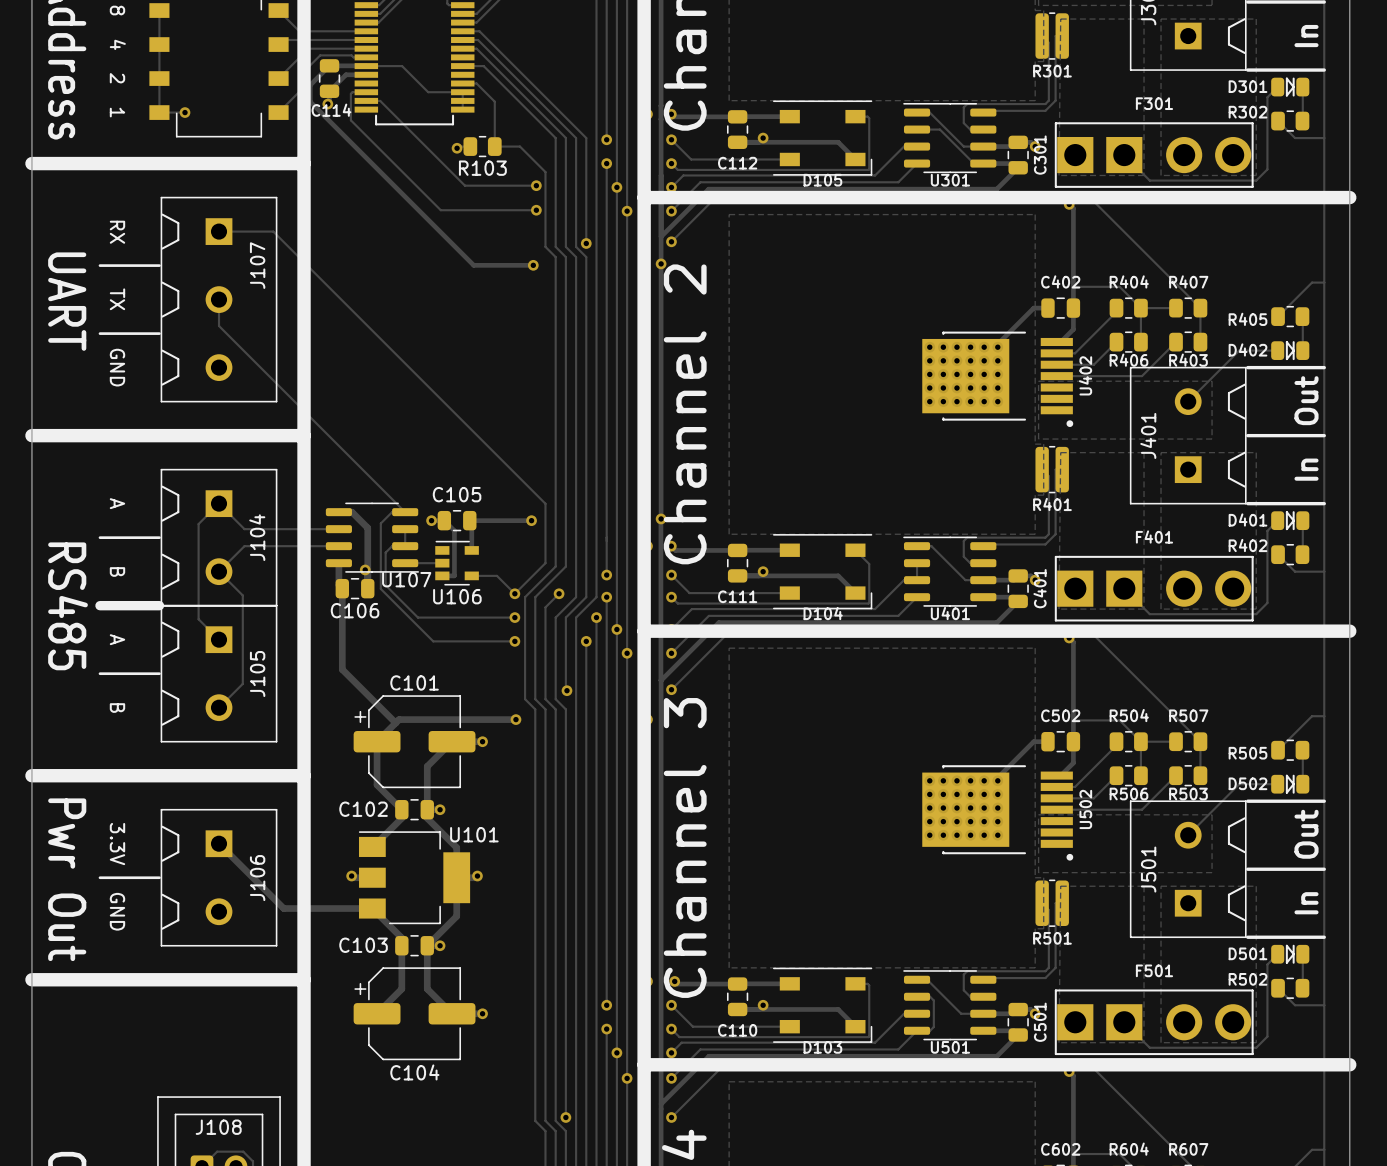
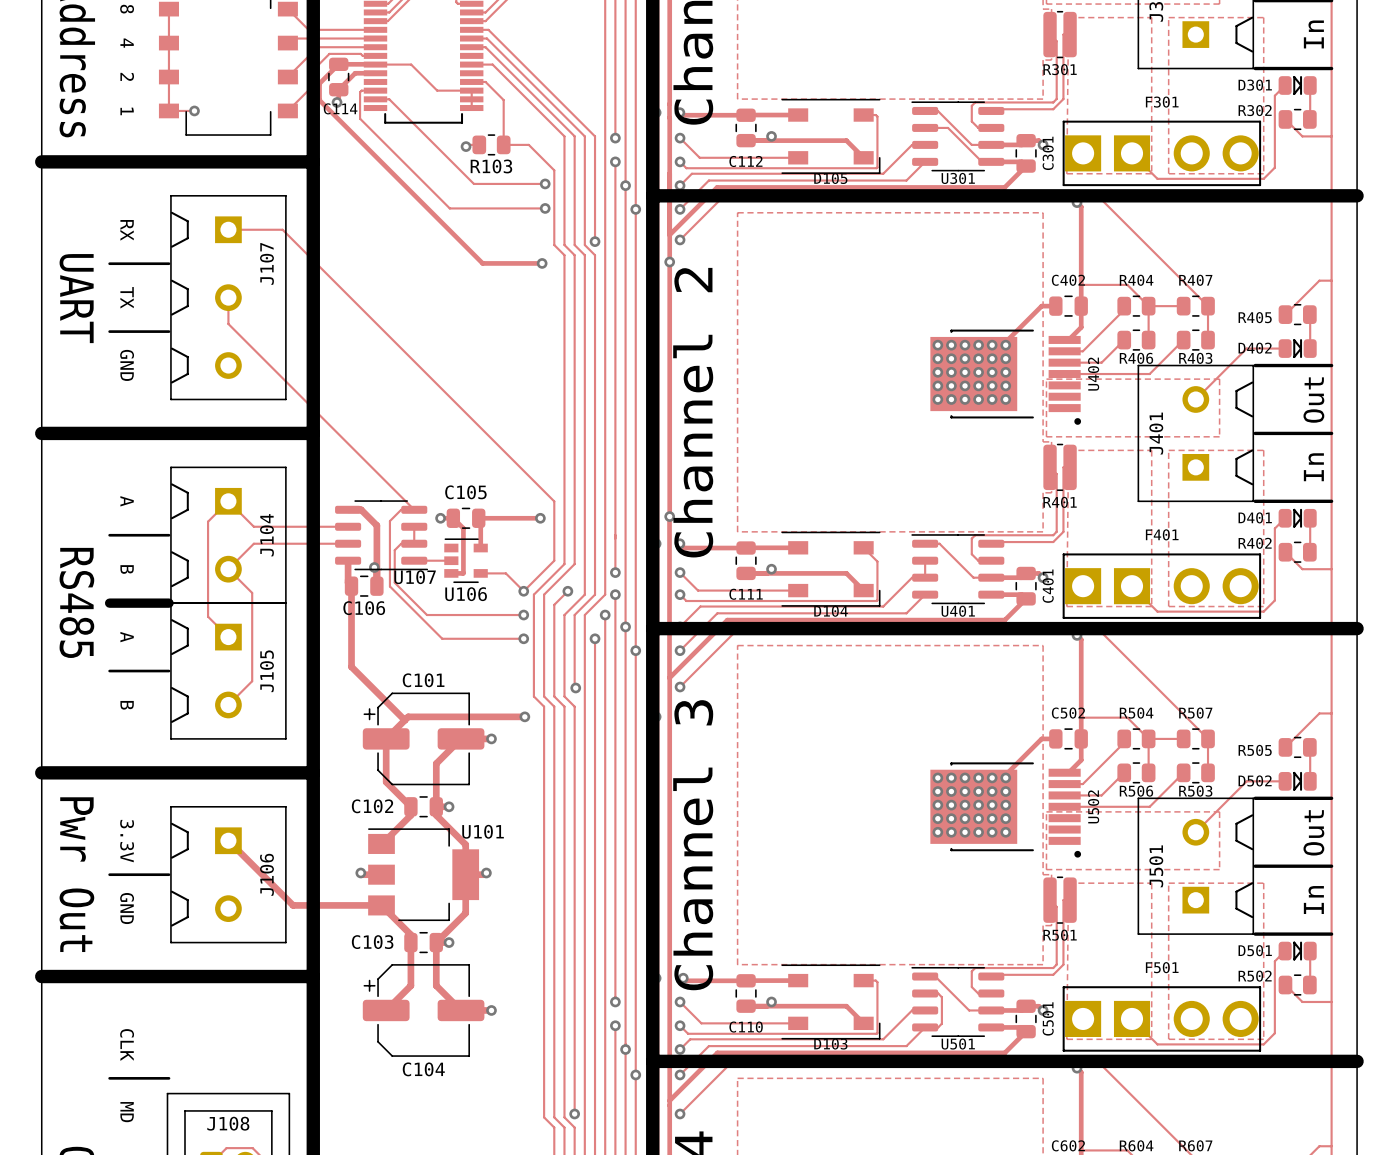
text: none -> CLK (127, 1044)
line: none -> (109, 1078) (169, 1078)
text: none -> MD (127, 1112)

